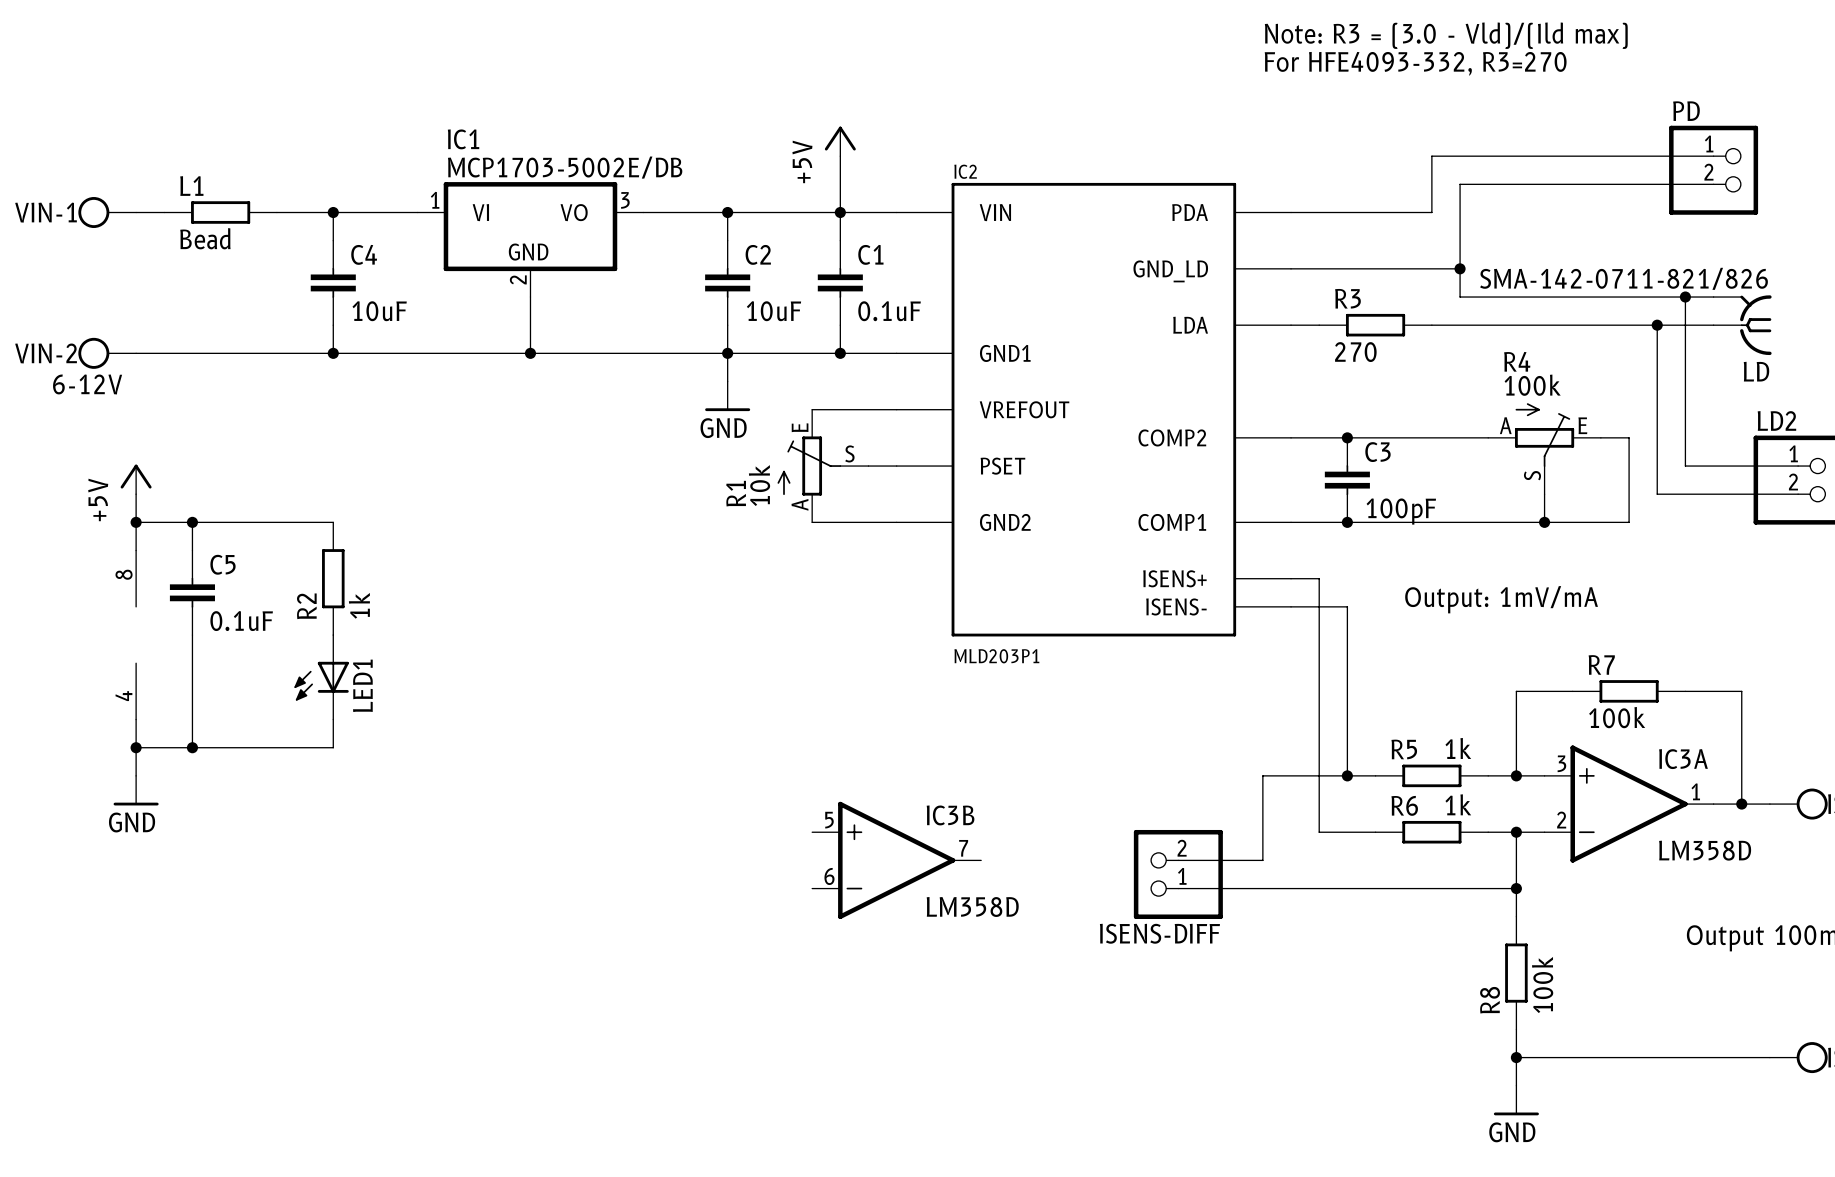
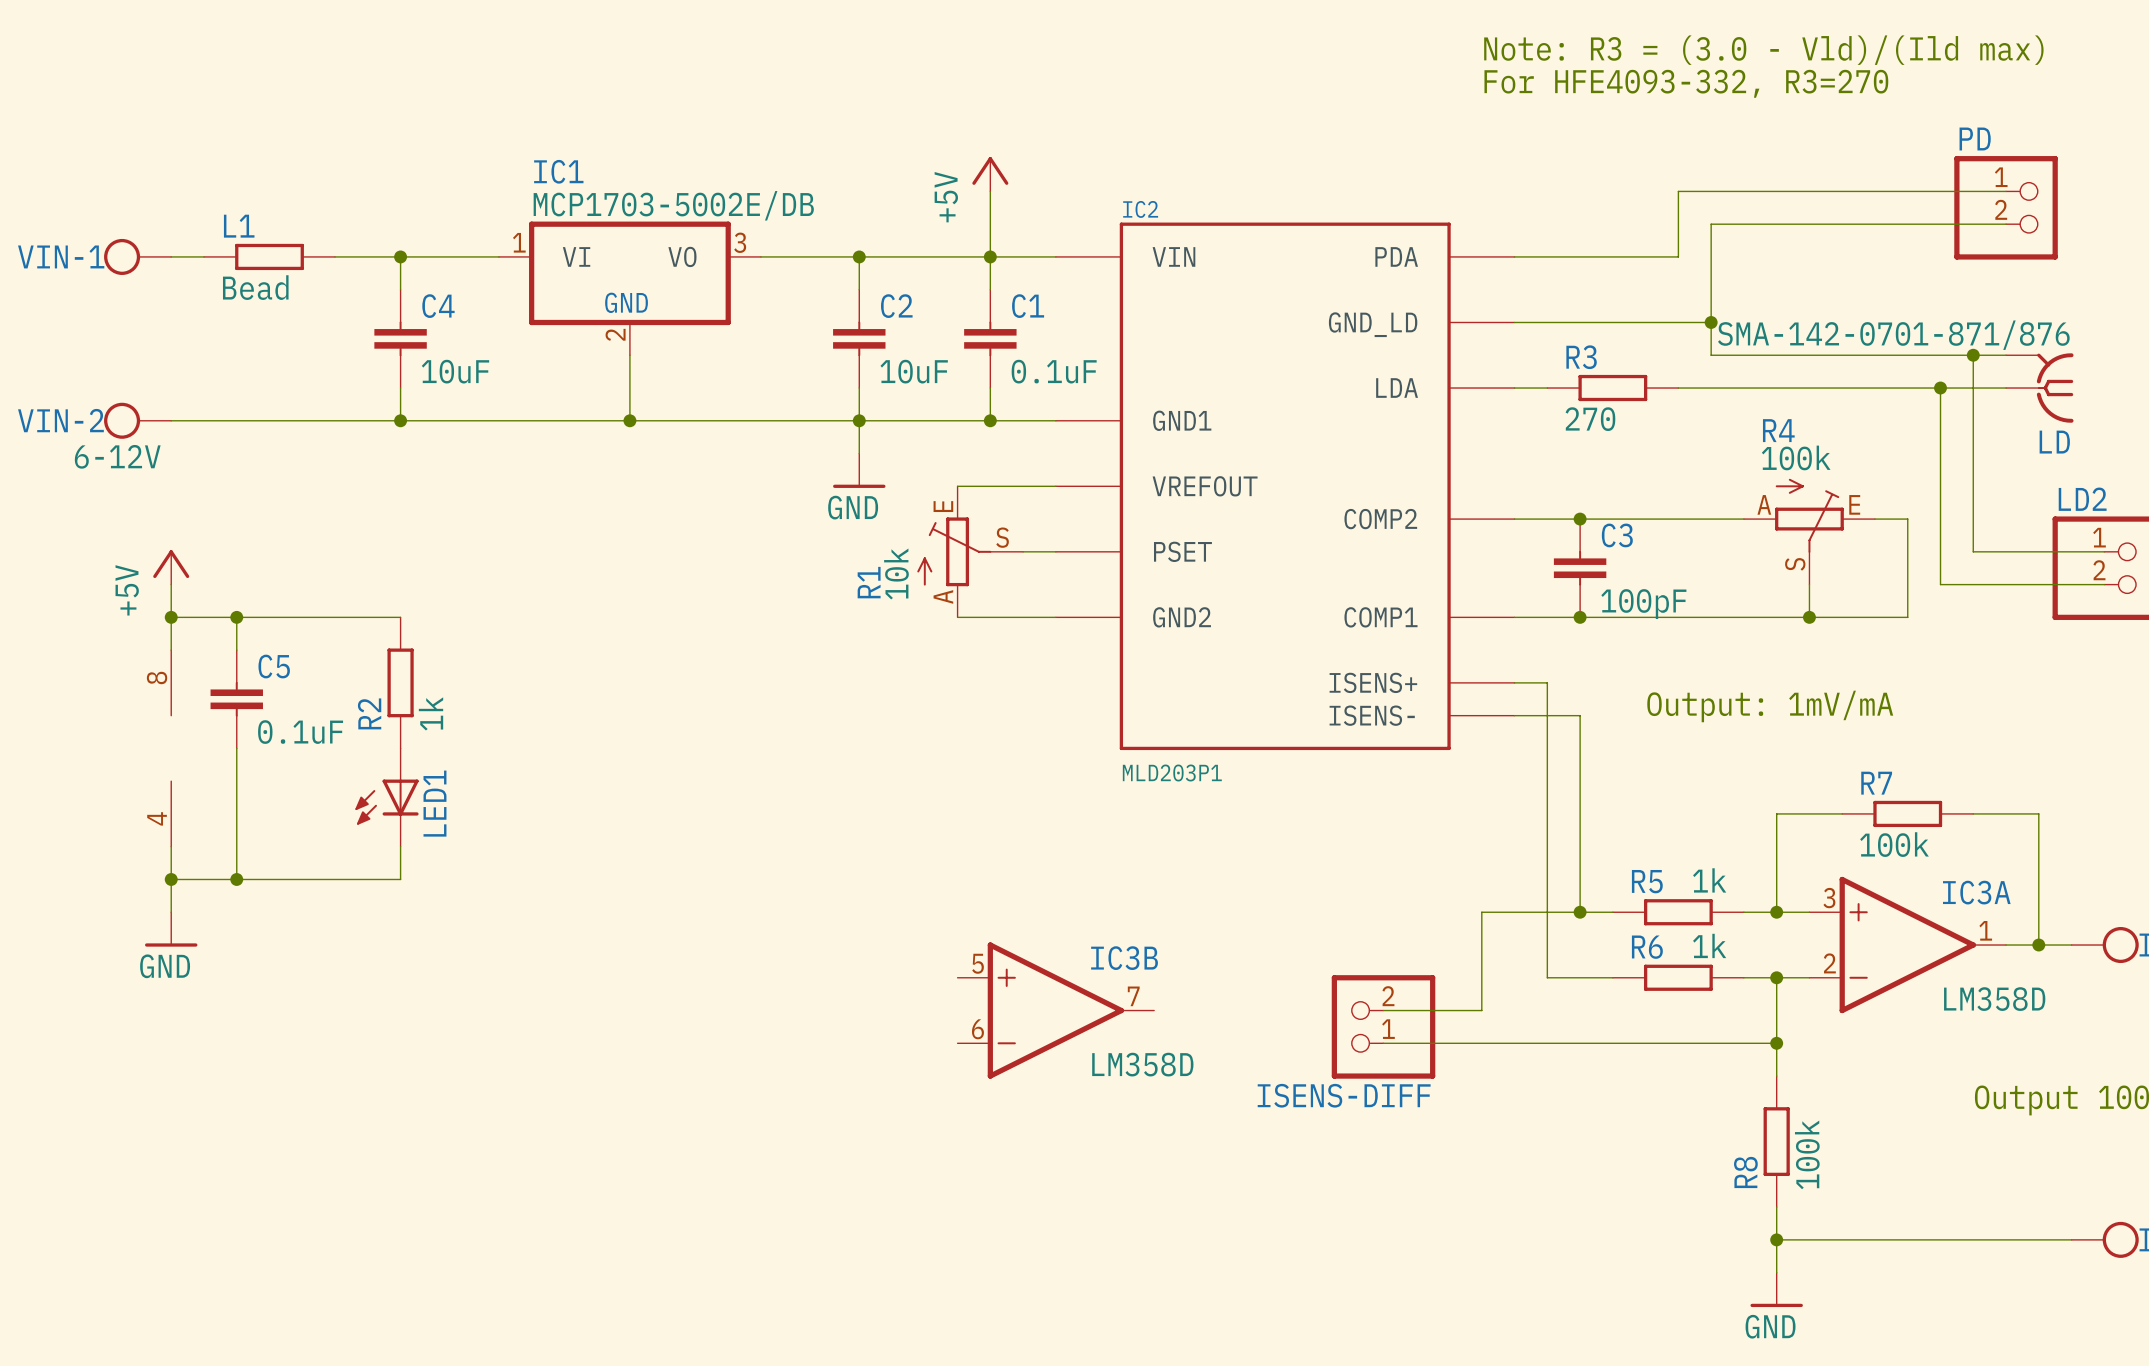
LD value: SMA-142-0711-821/826 (1624, 278) -> SMA-142-0701-871/876 (1893, 335)

